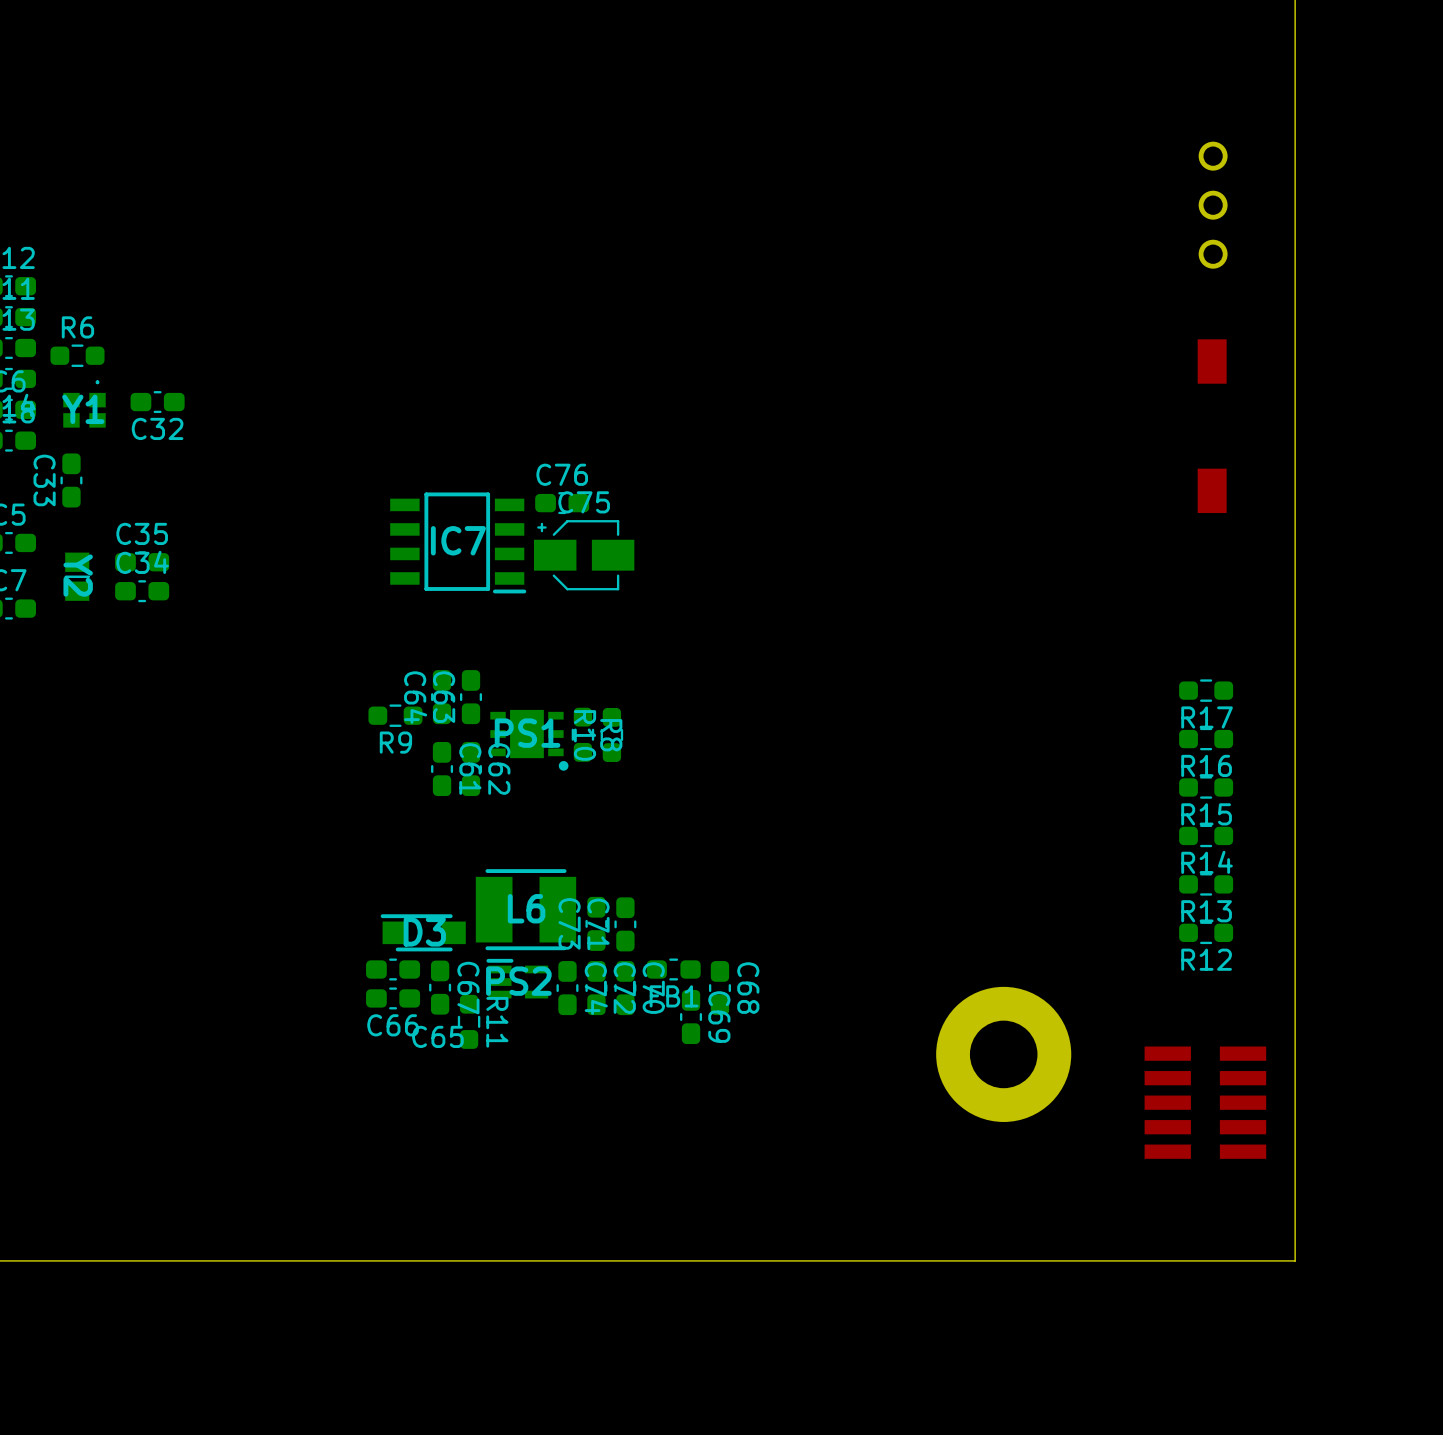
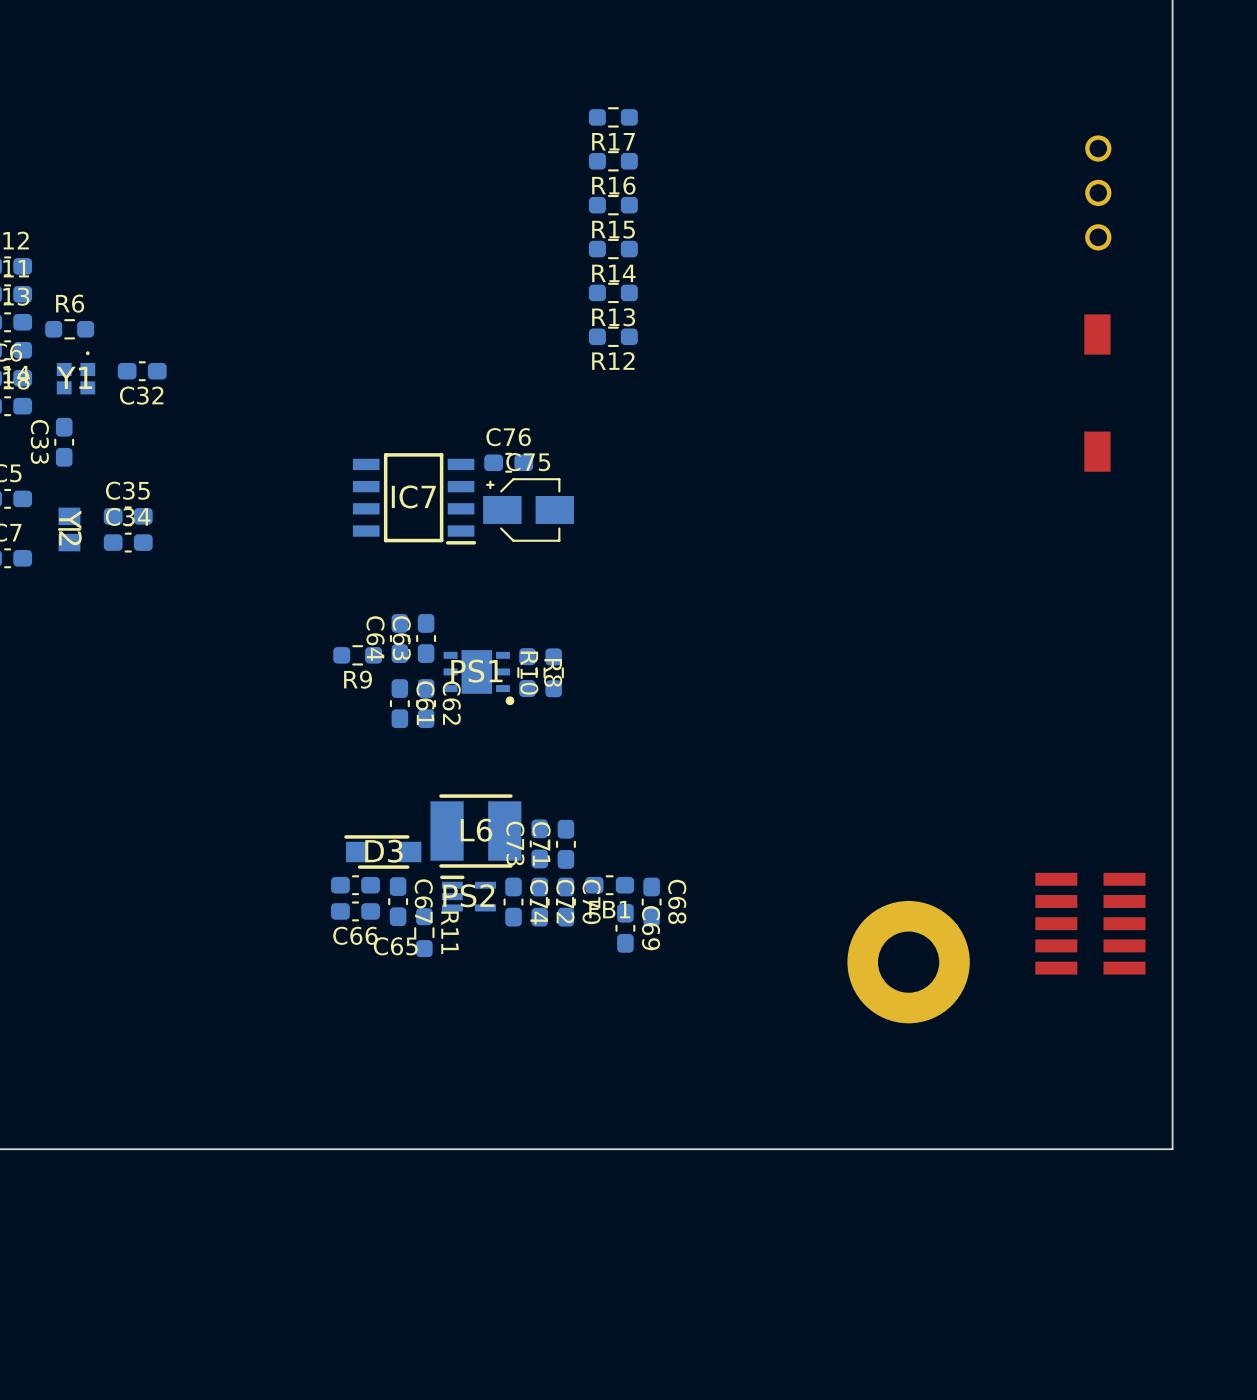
R17 position: (1206, 690) -> (613, 117)
R16 position: (1206, 739) -> (613, 161)
R15 position: (1206, 787) -> (613, 205)
R14 position: (1206, 835) -> (613, 249)
R13 position: (1206, 884) -> (613, 292)
R12 position: (1206, 932) -> (613, 336)
part position: (1205, 1102) -> (1090, 923)

